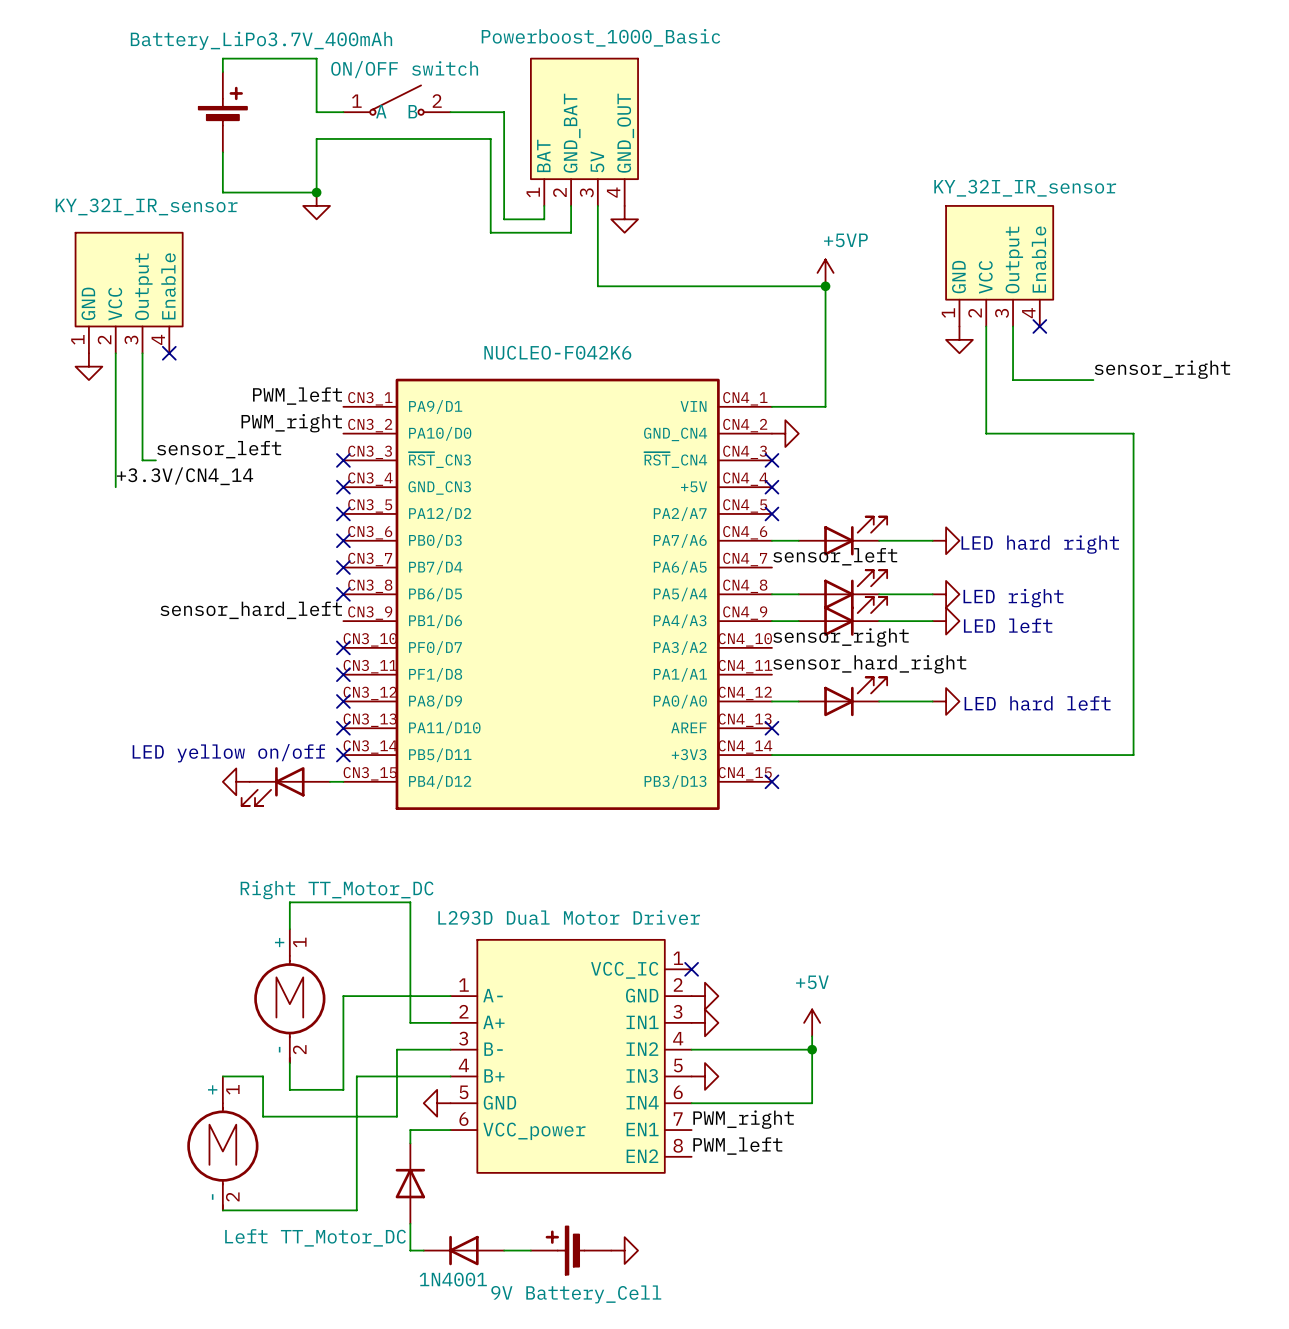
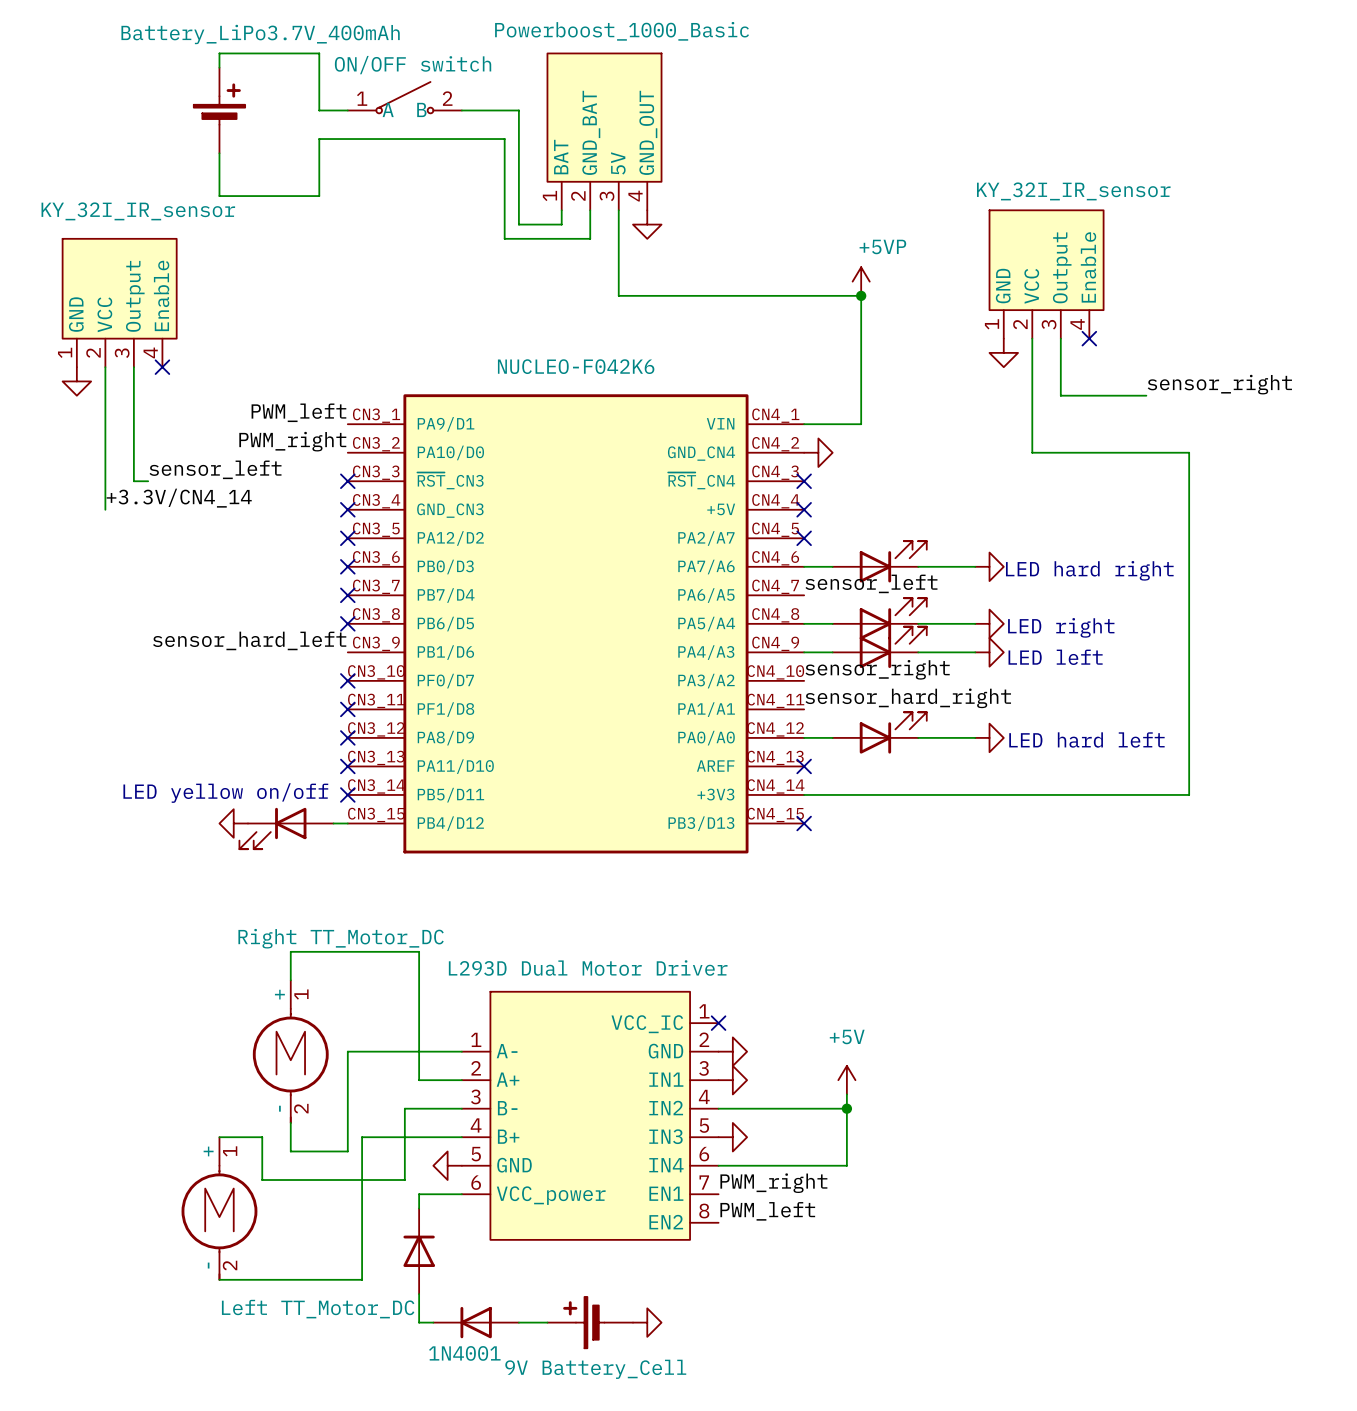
junction: (316, 192) -> none
power symbol: (316, 205) -> none

